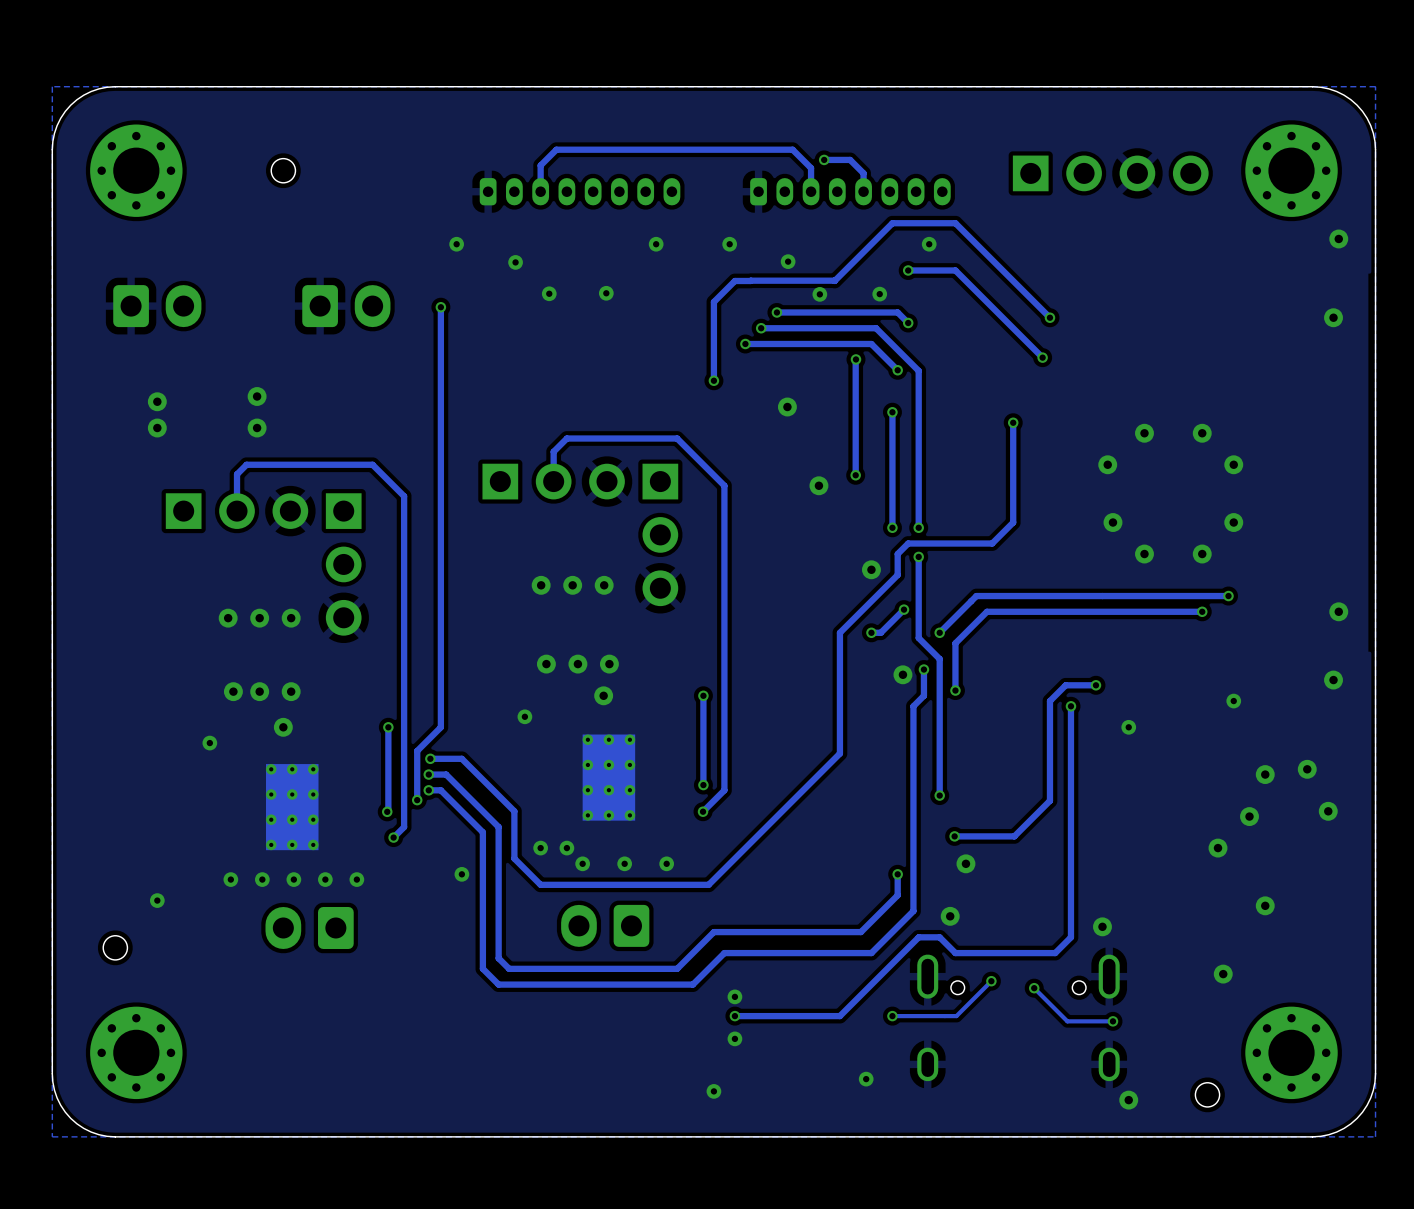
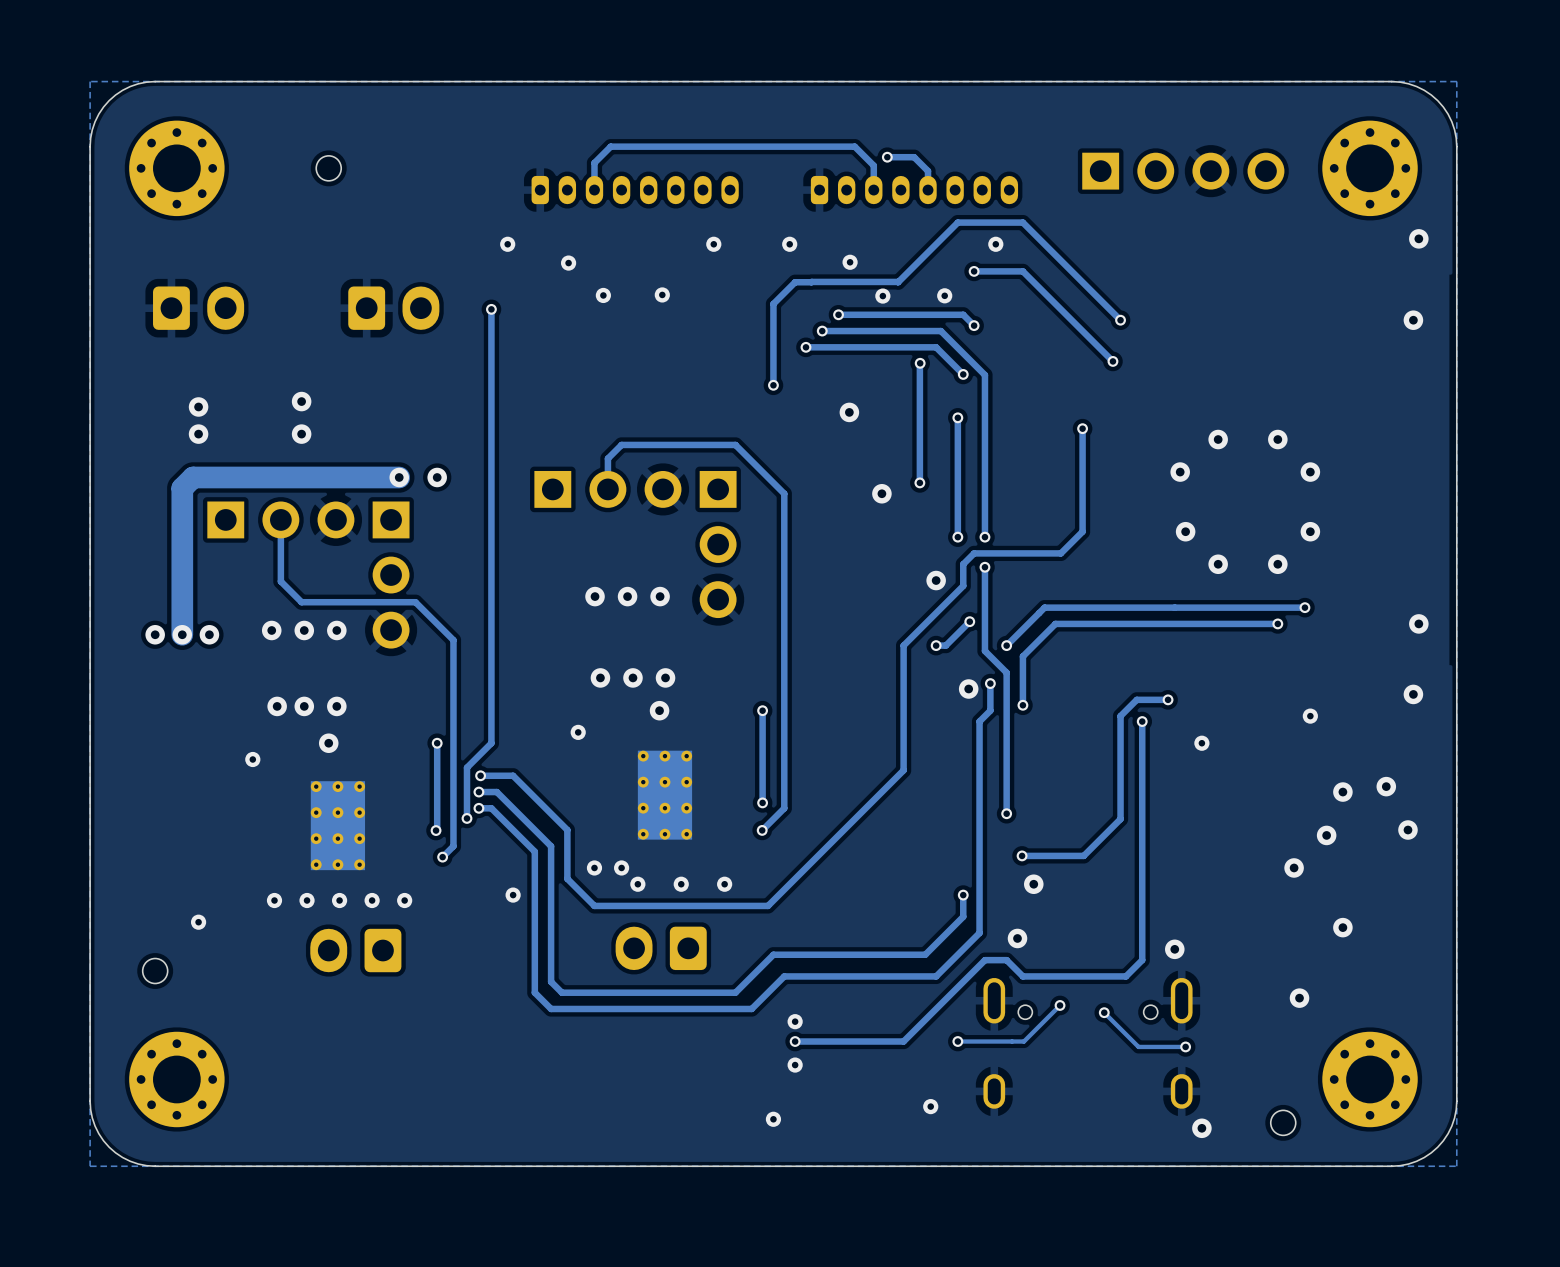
track: none -> (399, 477) (193, 477) (182, 488) (182, 634)
via: none -> (399, 477)
via: none -> (437, 477)
track: (237, 511) (237, 474) (246, 464) (372, 464) (404, 496) (404, 627) -> (280, 519) (280, 581) (301, 602) (415, 602) (453, 640)
via: none -> (155, 634)
via: none -> (182, 634)
via: none -> (209, 634)

